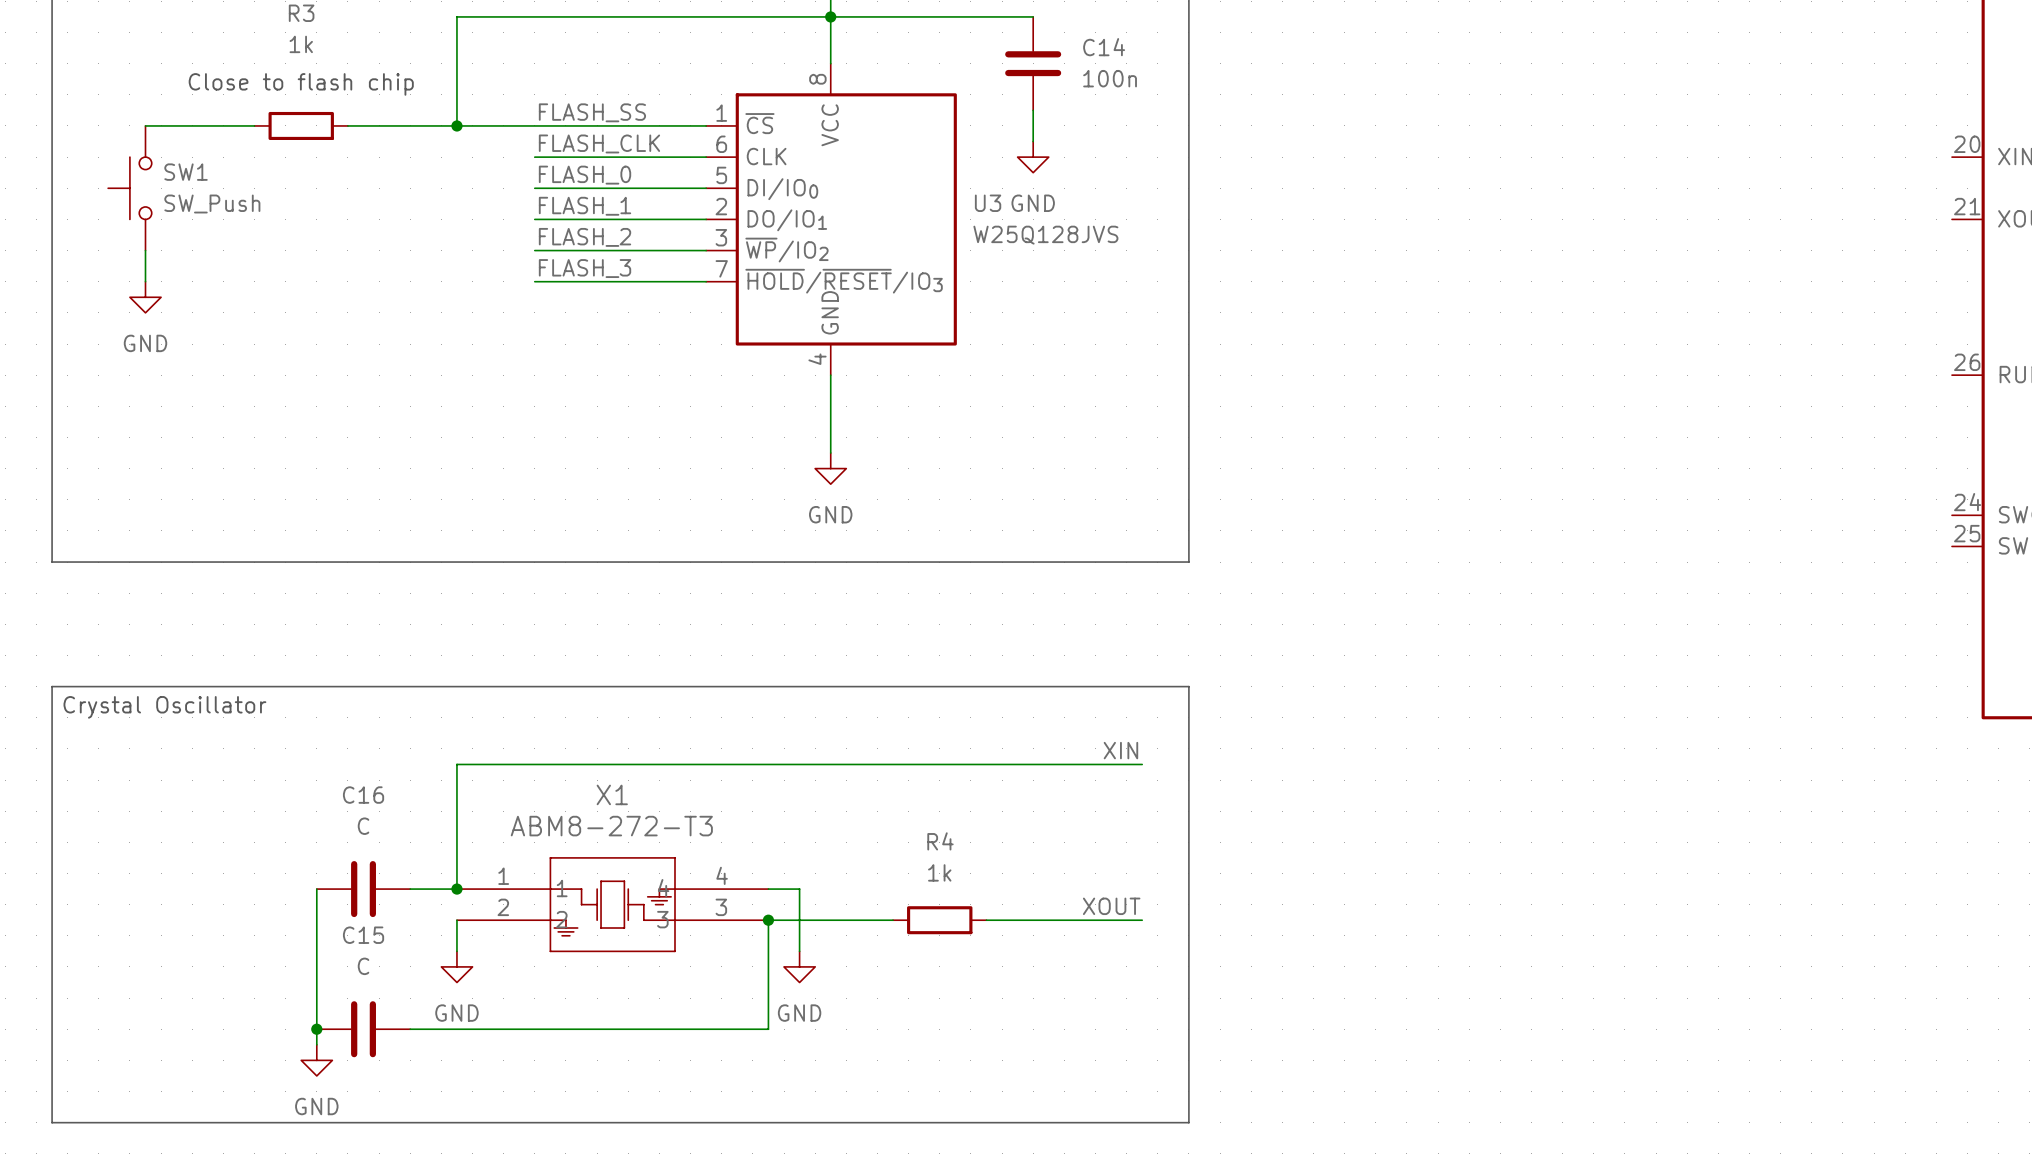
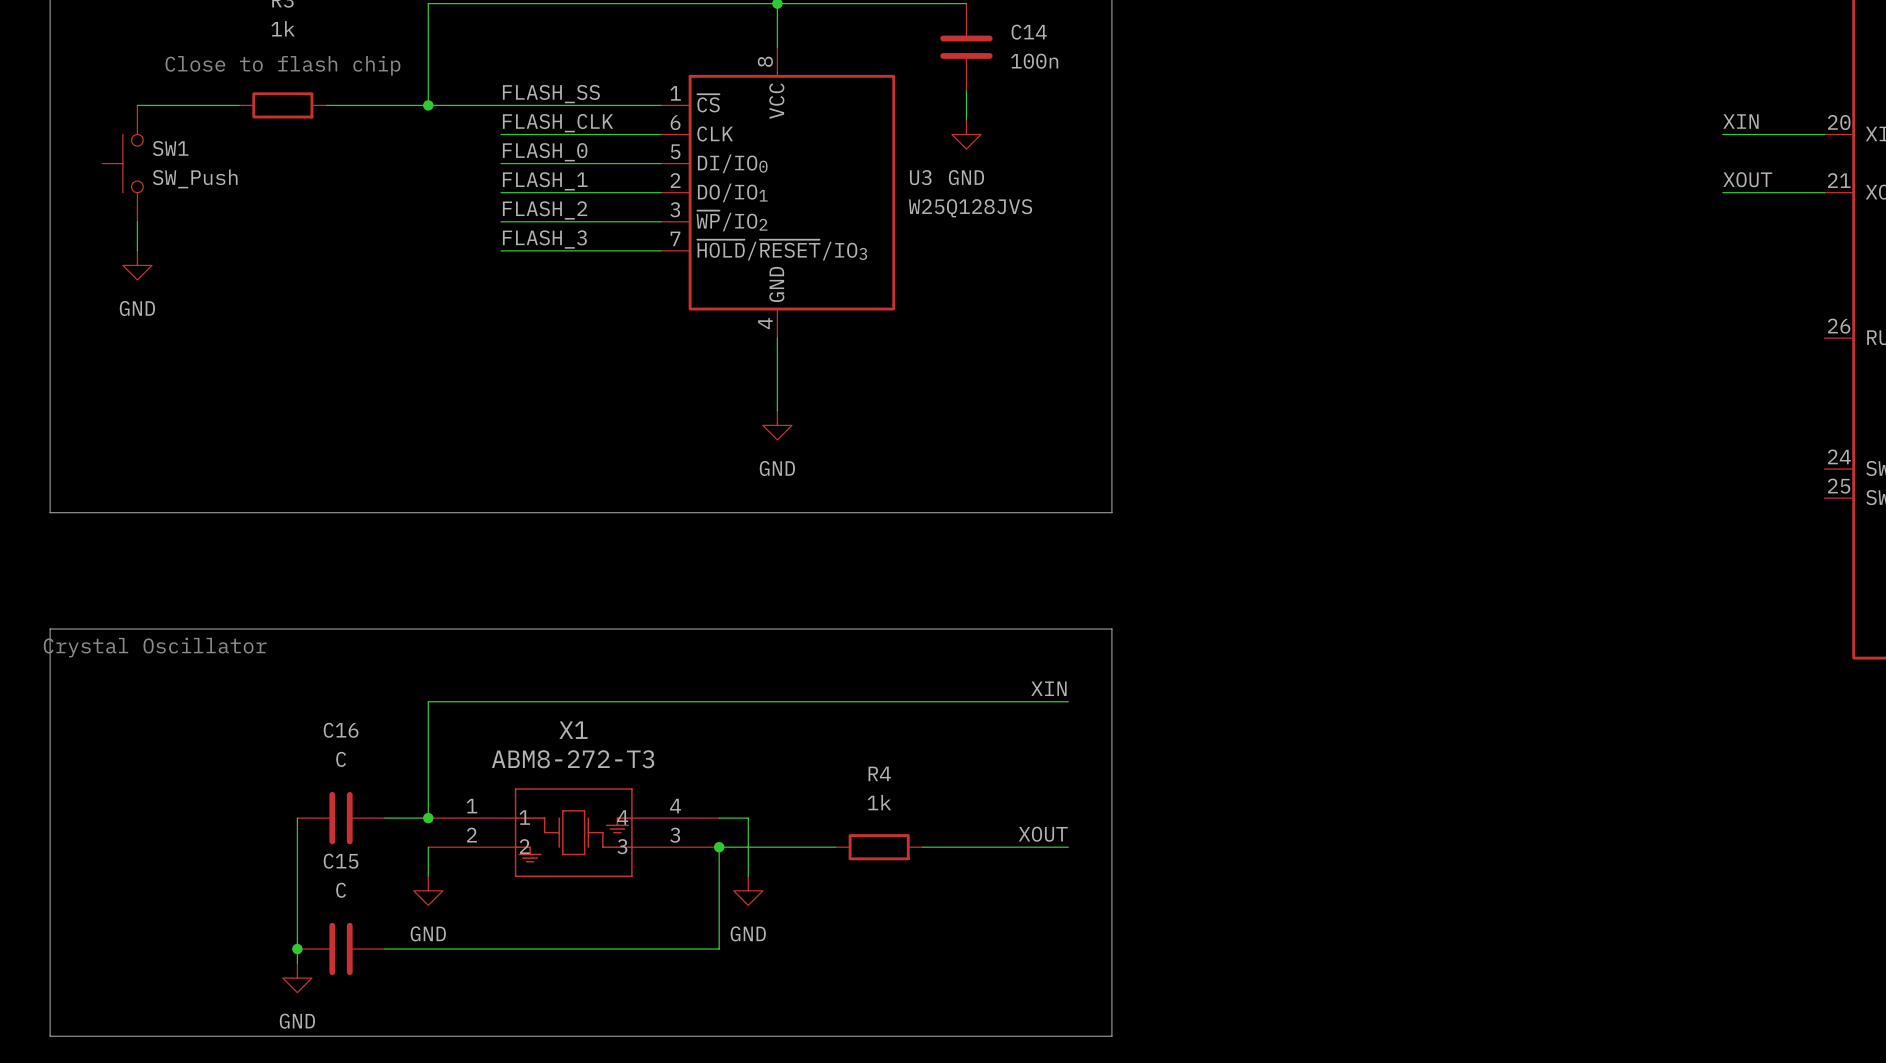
label: none -> XIN (1740, 121)
wire: none -> (1722, 134) (1824, 134)
label: none -> XOUT (1747, 179)
wire: none -> (1722, 192) (1824, 192)

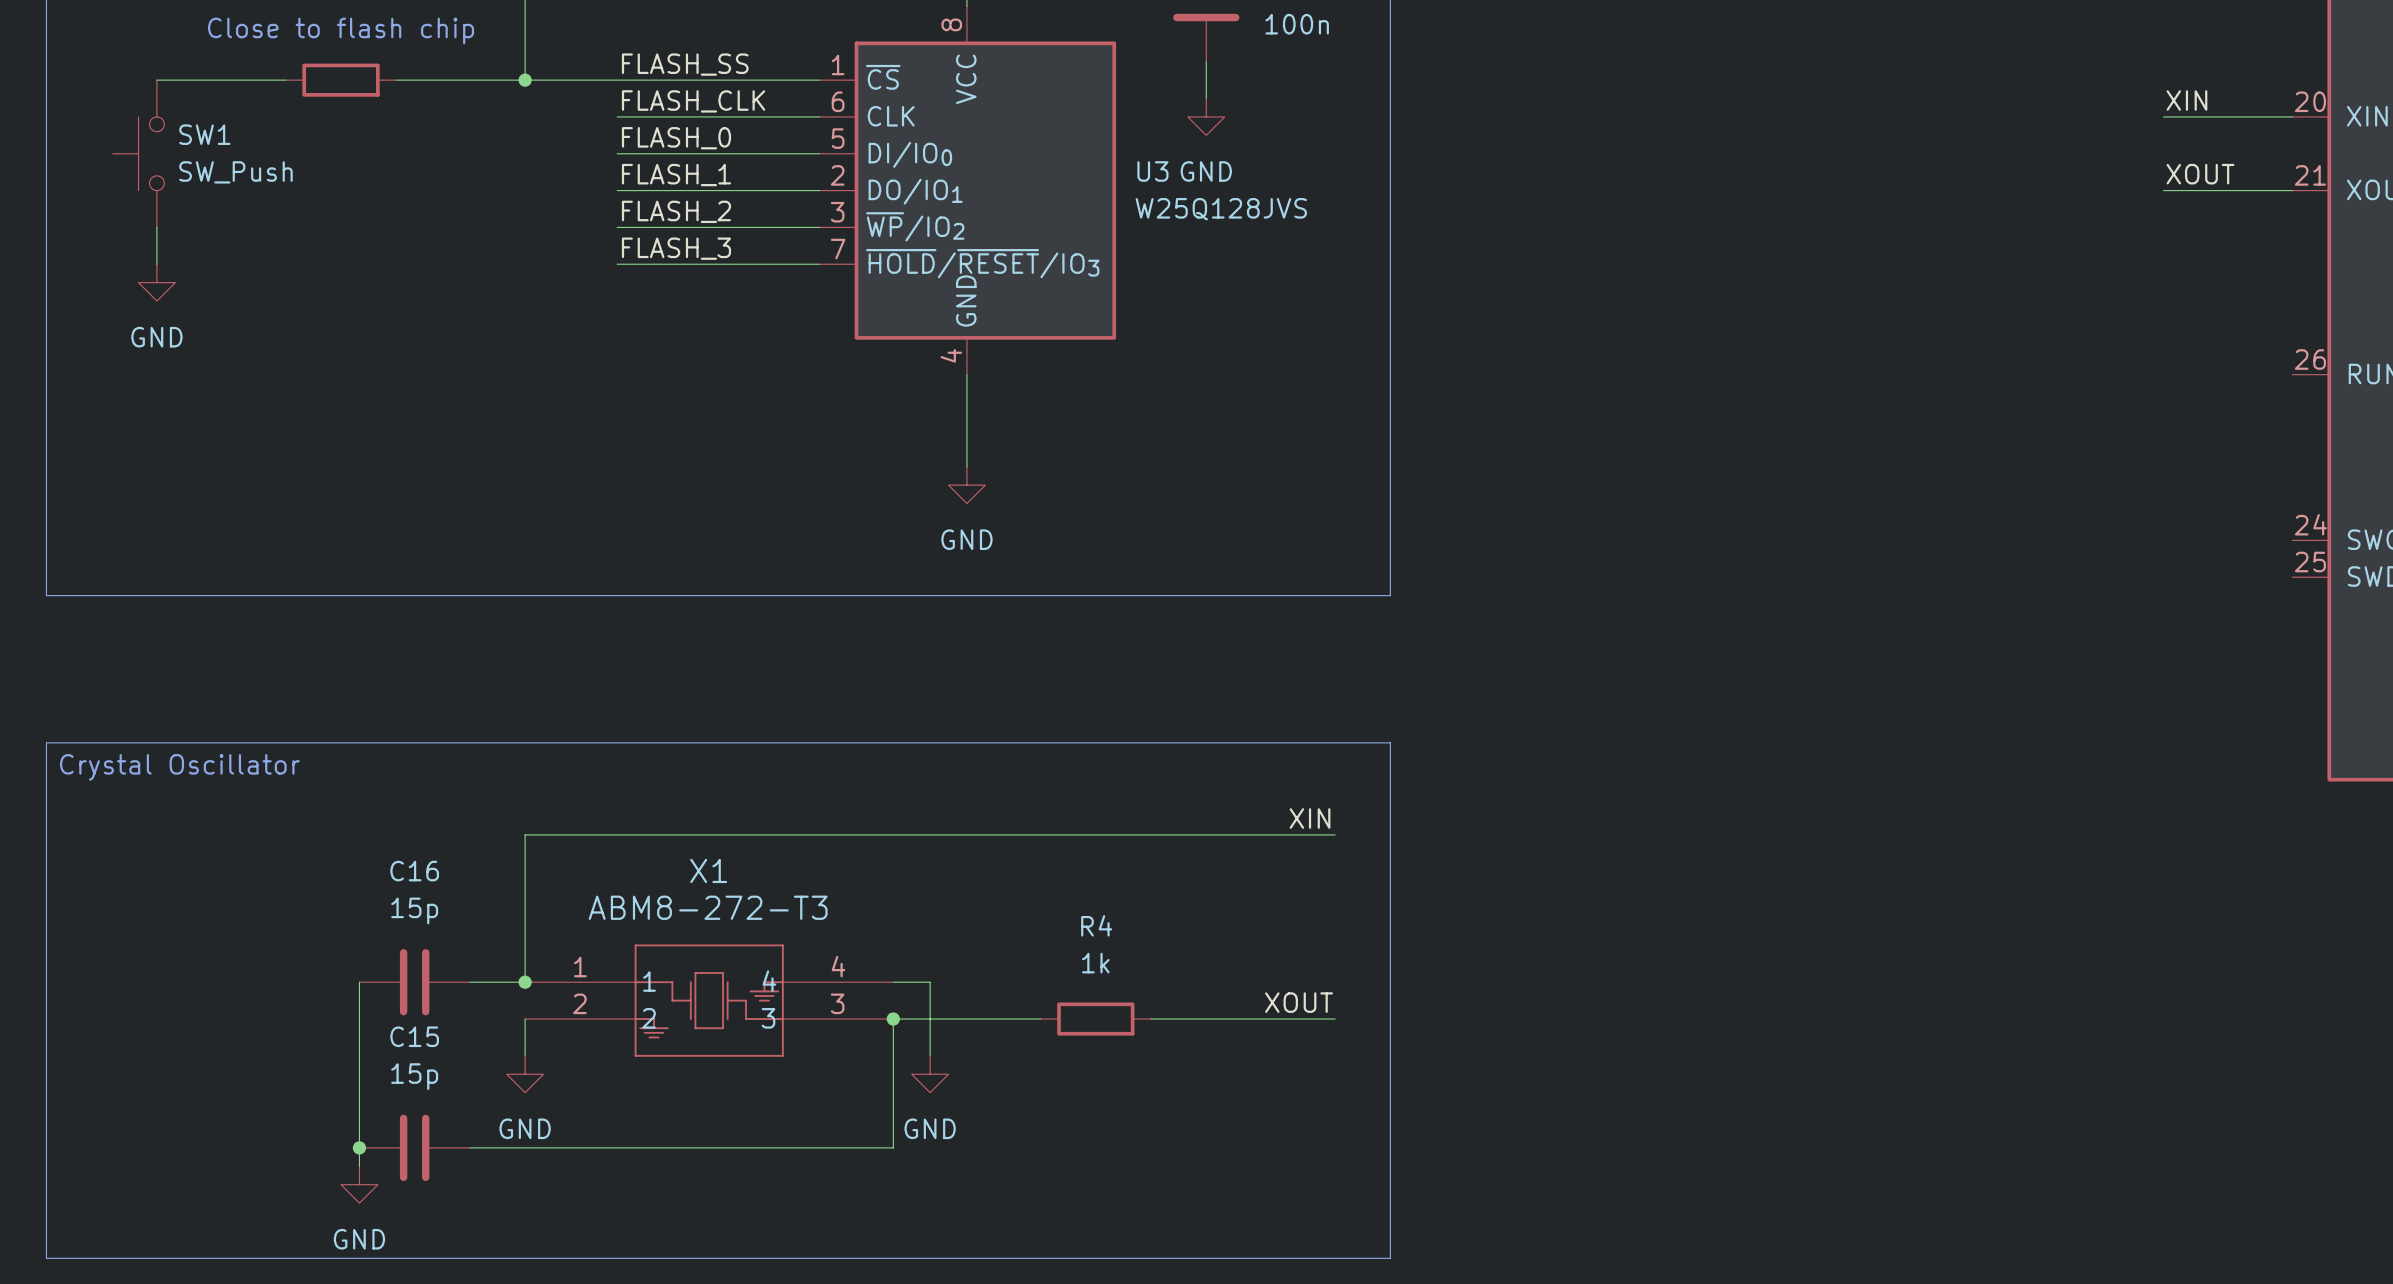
C16 value: C (341, 759) -> 15p (414, 910)
C15 value: C (341, 890) -> 15p (414, 1076)

